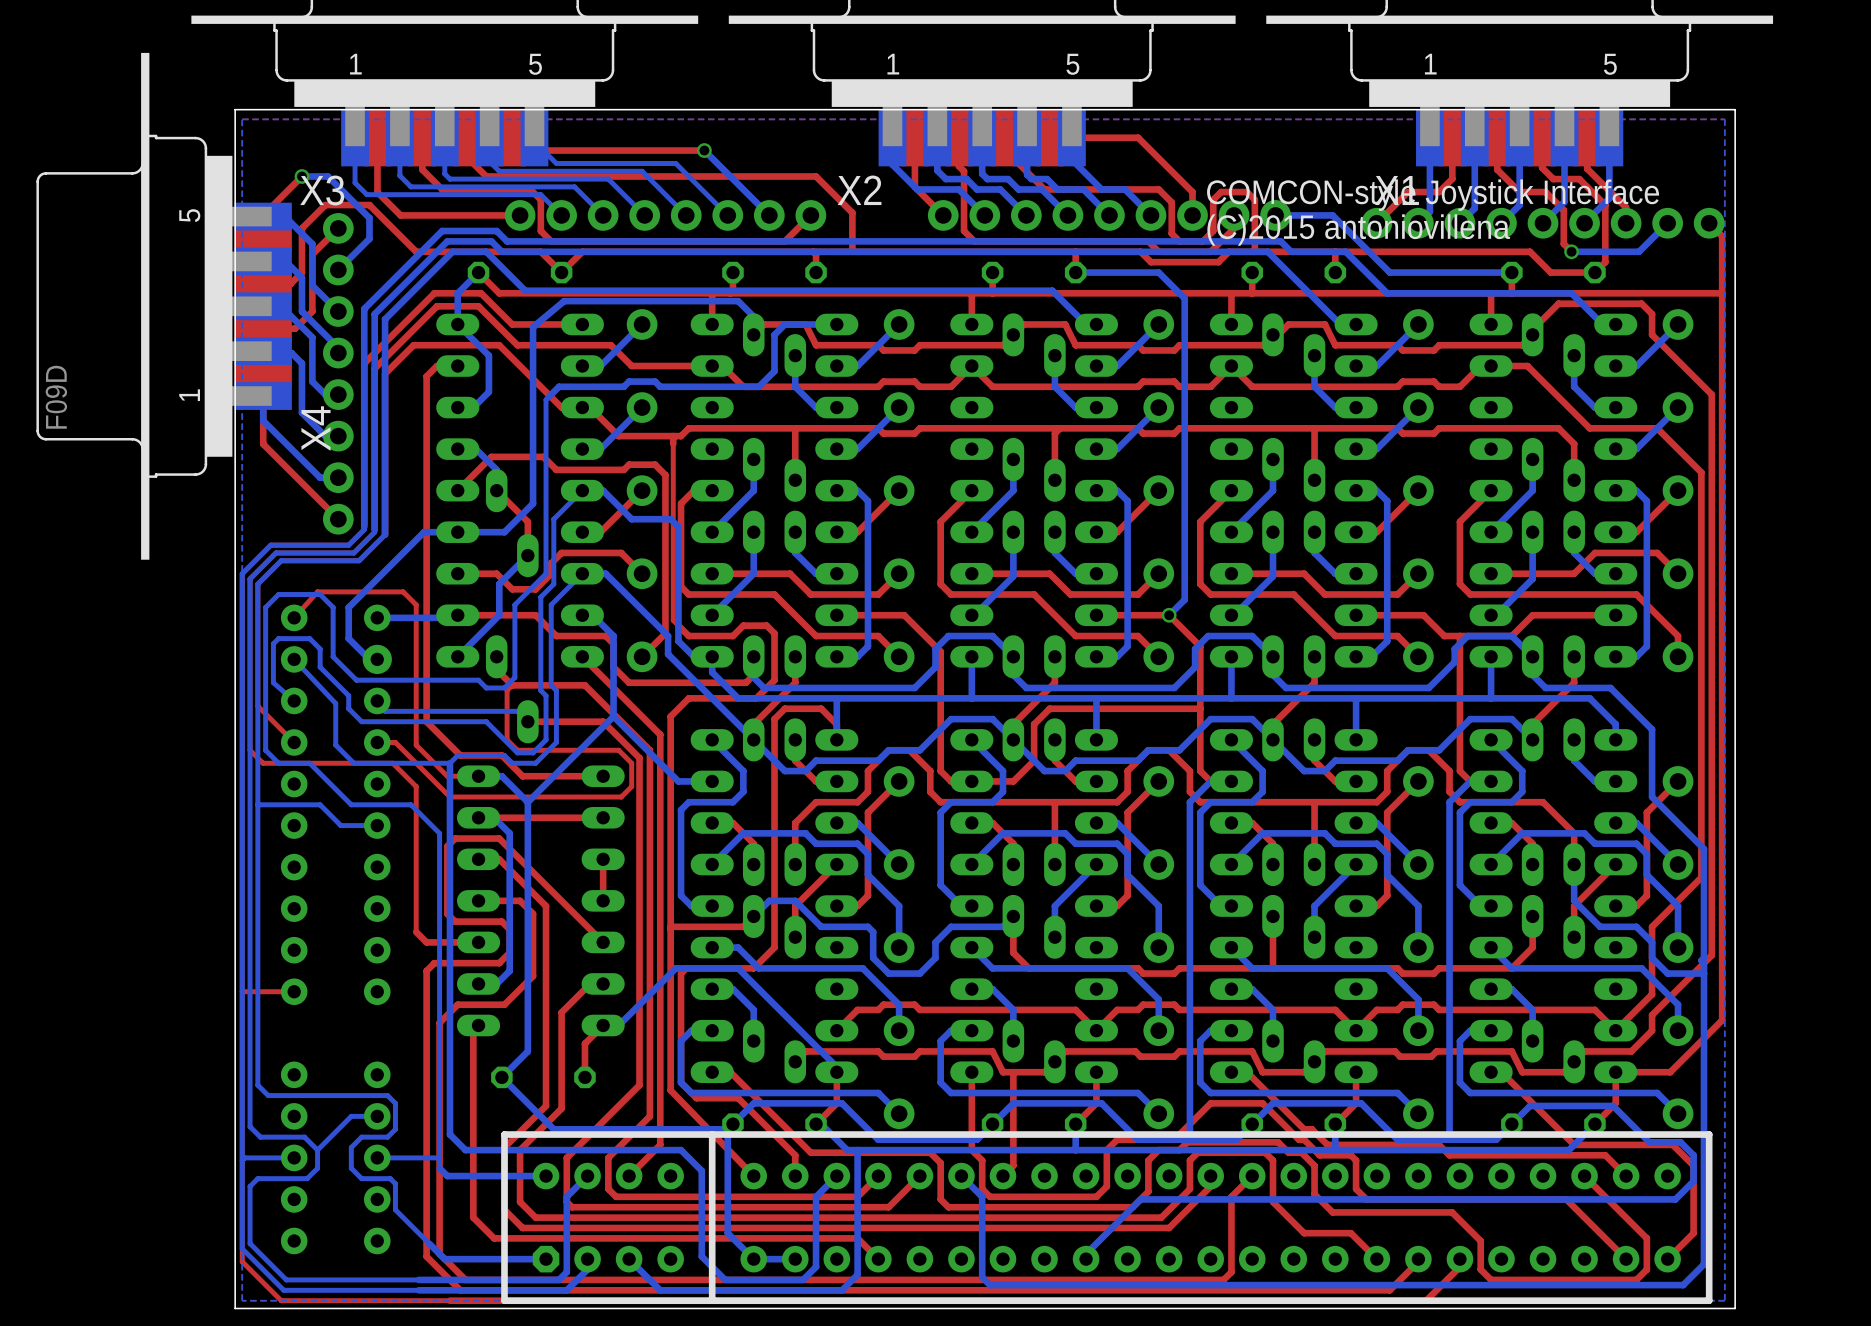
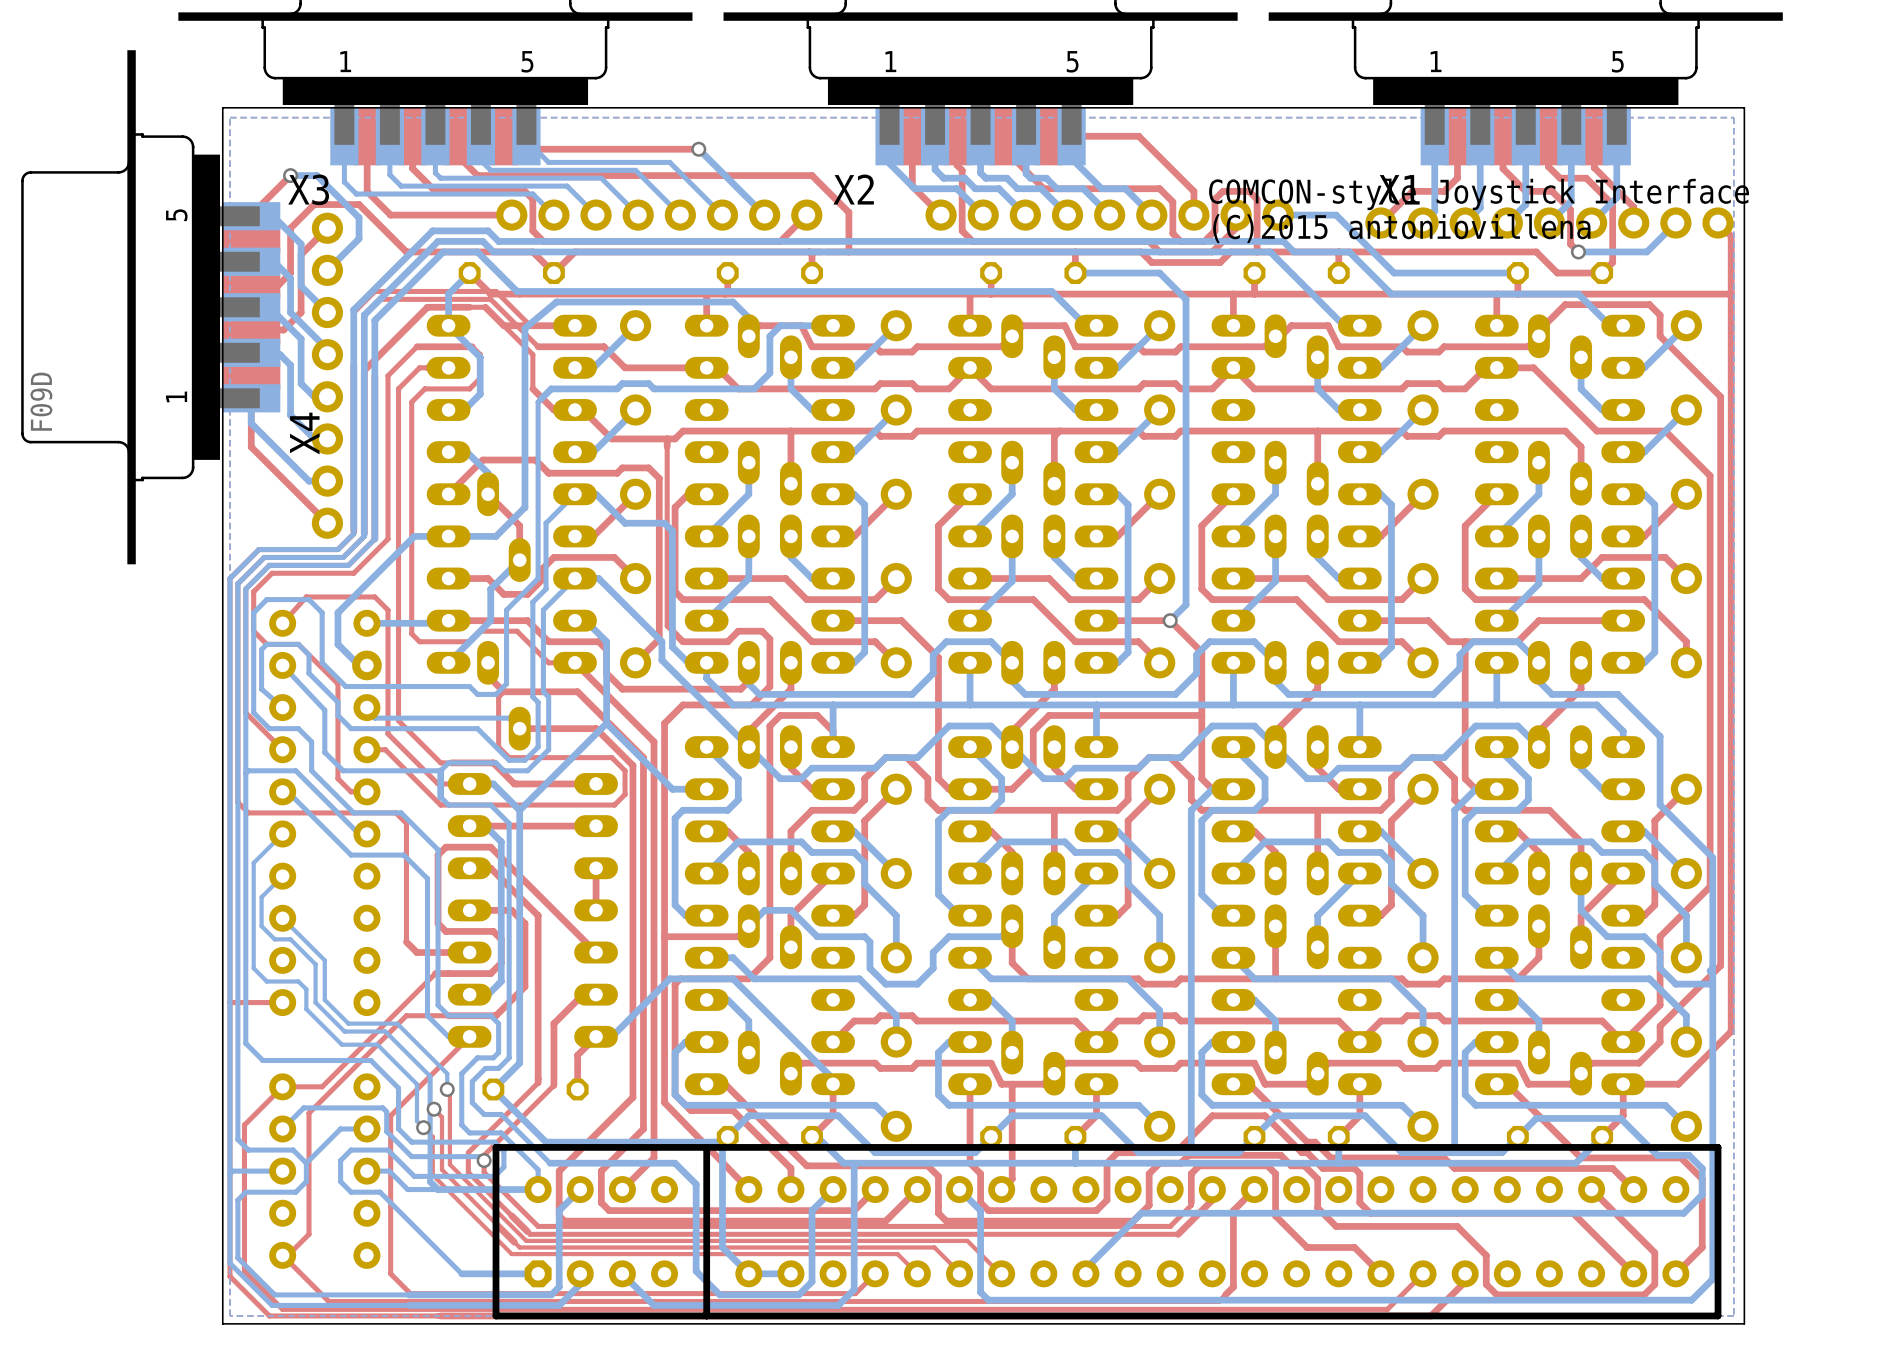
top track: (478, 306) (517, 345) (546, 345) -> (469, 307) (485, 307)
top track: (494, 306) (481, 293) (434, 293) (364, 363) -> (530, 325) (495, 291) (374, 291) (353, 312) (353, 365)
top track: (426, 345) (413, 345) (385, 373) -> (416, 346) (388, 375) (388, 539) (353, 573) (272, 573) (253, 591) (253, 631) (266, 644) (298, 644) (337, 683) (337, 778) (351, 791) (366, 791)
top track: (481, 345) (499, 345) (540, 386) -> (503, 325) (532, 354) (532, 388)
top track: none -> (472, 346) (480, 354) (480, 378) (469, 388) (424, 388) (411, 402) (411, 633) (419, 641) (469, 641) (480, 631) (517, 631) (548, 662) (575, 662)
top track: none -> (538, 346) (490, 299) (380, 299) (364, 315) (364, 370)
top track: (436, 366) (426, 376) (426, 721) (460, 755) -> (427, 367) (419, 367) (398, 388) (398, 720) (440, 762) (451, 762)
top track: (385, 591) (403, 591) (416, 604) (416, 745) -> (374, 596) (388, 610) (388, 733) (406, 752)
bottom track: (265, 706) (265, 750) (278, 763) -> (245, 773) (248, 770) (266, 770)
bottom track: none -> (253, 712) (269, 728) (298, 728) (311, 741) (311, 770) (353, 812)
top track: (250, 750) (263, 763) (392, 763) (416, 786) (416, 815) -> (237, 757) (237, 802) (248, 812) (395, 812) (406, 823)
bottom track: (307, 763) (309, 763) (351, 804) (364, 804) -> (295, 770) (359, 834)
bottom track: (449, 789) (449, 1134) (465, 1150) (557, 1150) -> (440, 797) (448, 805) (490, 805) (509, 823) (509, 1057) (498, 1068) (485, 1068) (472, 1081) (472, 1102) (484, 1114) (501, 1114) (549, 1163)
bottom track: (320, 804) (257, 804) -> (309, 812) (287, 791) (282, 791)
bottom track: none -> (282, 834) (253, 862) (253, 968) (266, 981) (298, 981) (306, 989) (306, 1009) (341, 1044) (377, 1044) (416, 1084) (416, 1121) (423, 1127)
bottom track: (369, 825) (340, 825) -> (469, 1036) (448, 1036) (427, 1015) (427, 878) (403, 855) (351, 855) (330, 834)
bottom track: (439, 833) (439, 1064) -> (282, 876) (261, 897) (261, 926) (274, 939) (290, 939) (315, 964) (315, 1002) (344, 1031) (385, 1031) (430, 1076)
bottom track: none -> (430, 841) (438, 849) (438, 1005) (448, 1015) (490, 1015) (498, 1023) (498, 1052) (493, 1057) (477, 1057) (461, 1073) (461, 1125) (469, 1132) (501, 1132) (538, 1169) (538, 1189)
bottom track: none -> (282, 918) (324, 960) (324, 999) (348, 1023) (397, 1023) (447, 1073) (447, 1089)
top track: (444, 963) (434, 963) (426, 970) (426, 1256) (460, 1290) (1389, 1290) (1418, 1261) (1418, 1259) -> (435, 973) (322, 1086) (282, 1086) (244, 1125) (244, 1271) (282, 1309) (1387, 1309) (1423, 1273)
top track: (457, 1004) (439, 1022) (439, 1253) (465, 1279) (1223, 1279) -> (448, 1015) (406, 1015) (309, 1113) (309, 1234) (287, 1255) (282, 1255) (328, 1301) (1218, 1301) (1225, 1294)
top track: (473, 1030) (473, 1217) (494, 1238) (857, 1238) (878, 1259) -> (464, 1042) (390, 1115) (390, 1273) (410, 1293) (855, 1293) (875, 1273)
bottom track: (257, 1031) (257, 1085) (268, 1095) (314, 1095) -> (245, 1043) (262, 1060) (370, 1060) (398, 1088) (398, 1128) (411, 1142) (494, 1142) (503, 1151) (503, 1167) (494, 1176) (414, 1176) (388, 1150) (377, 1150)
top track: (546, 1070) (546, 1105) (504, 1147) (504, 1209) -> (434, 1109) (442, 1117) (442, 1169) (495, 1223)
top track: (561, 1073) (561, 1108) (520, 1150) (520, 1202) -> (538, 1082) (468, 1152) (468, 1172) (511, 1215)
top track: none -> (447, 1089) (449, 1092) (449, 1164) (526, 1240) (967, 1240) (1001, 1273)
via: none -> (447, 1089)
bottom track: none -> (303, 1107) (282, 1128)
bottom track: (387, 1095) (395, 1103) (395, 1129) (387, 1137) -> (377, 1107) (382, 1107) (386, 1111) (386, 1131) (411, 1156) (480, 1156) (484, 1160)
via: none -> (434, 1109)
top track: none -> (423, 1127) (432, 1136) (432, 1175) (511, 1254) (897, 1254) (917, 1273)
via: none -> (423, 1127)
via: none -> (484, 1160)
bottom track: (439, 1157) (399, 1157) -> (438, 1189) (407, 1189) (389, 1171)
bottom track: (395, 1183) (395, 1209) (444, 1259) (470, 1259) -> (385, 1197) (461, 1273)
top track: (1189, 1189) (1161, 1217) (535, 1217) -> (1191, 1202) (1191, 1205) (1170, 1226) (538, 1226) (484, 1172) (484, 1155) (553, 1085)
top track: (1176, 1220) (1169, 1228) (522, 1228) -> (1178, 1234) (530, 1234) (527, 1231)
top track: none -> (514, 1242) (519, 1247) (934, 1247) (959, 1273)

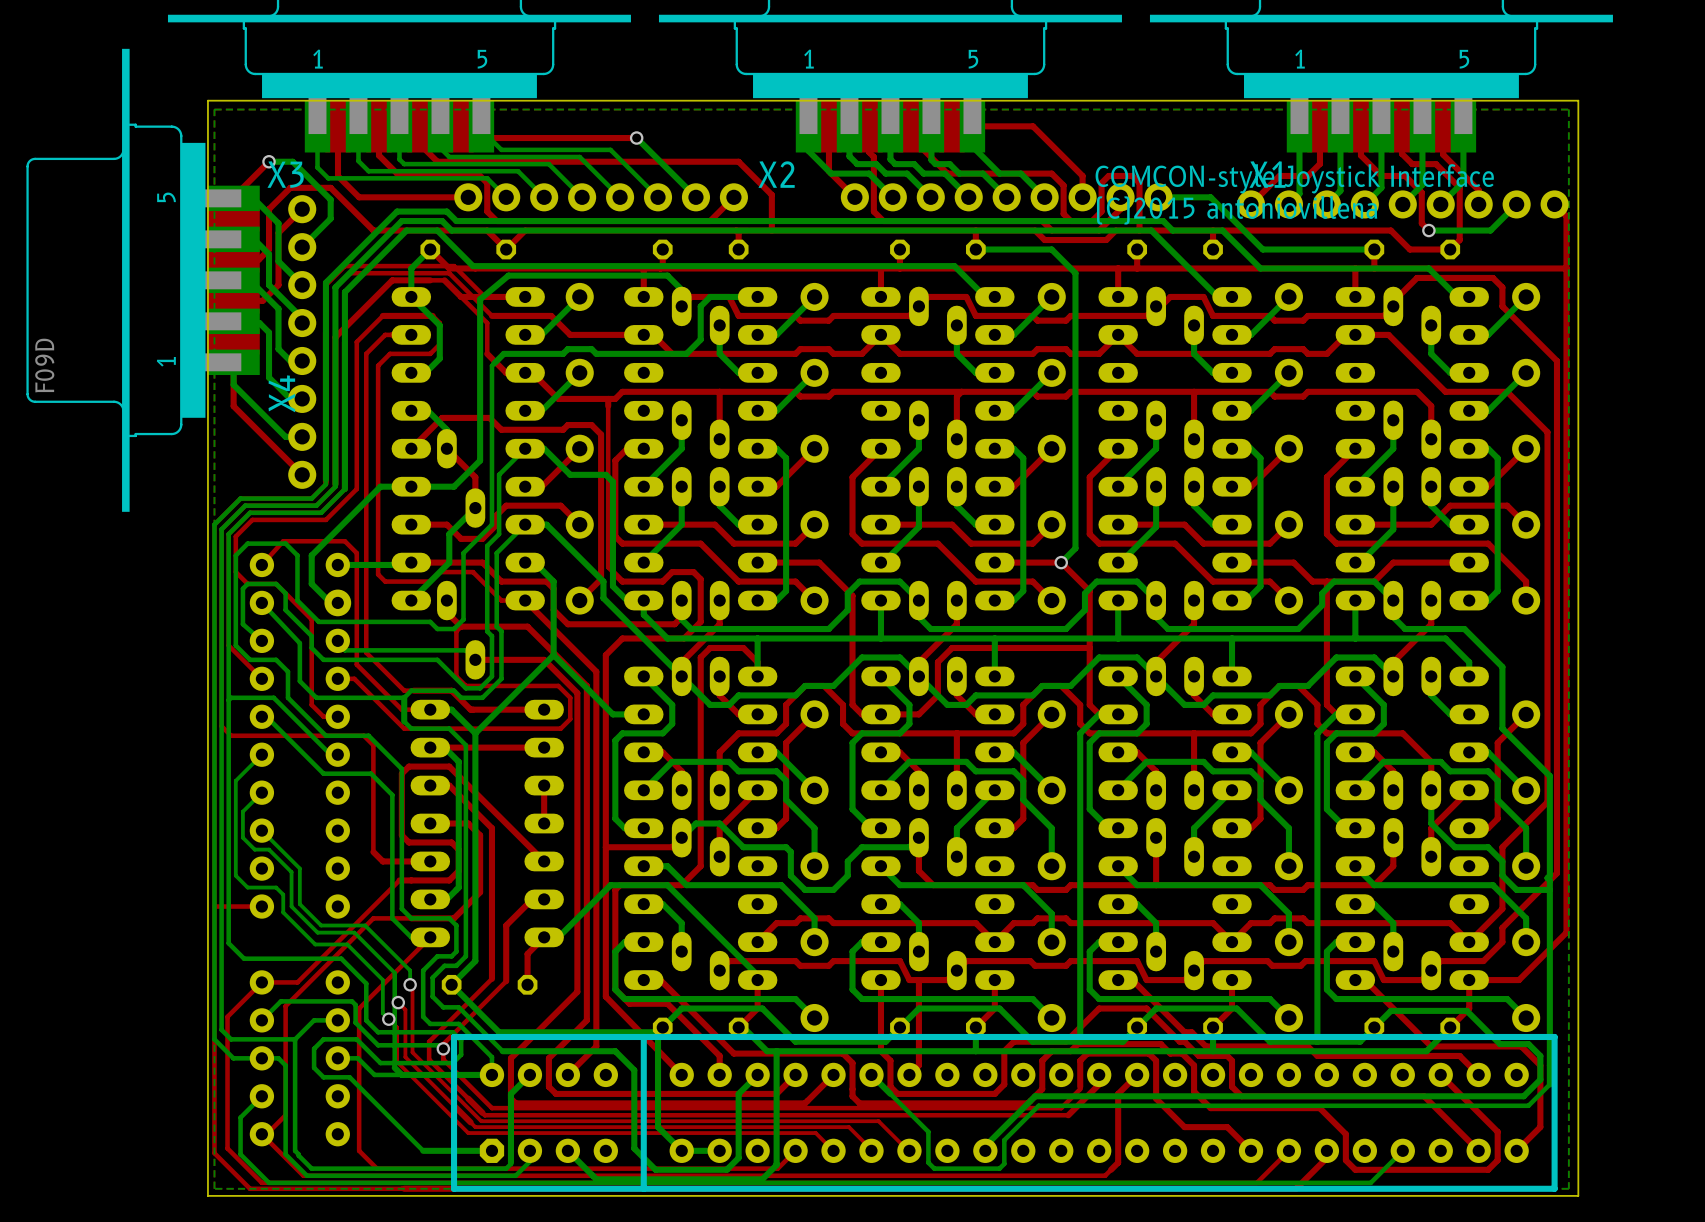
bottom track: (229, 1150) (229, 1263) (272, 1305) (559, 1305) (580, 1284) -> (261, 1058) (278, 1058) (285, 1065) (285, 1154) (306, 1175) (515, 1175) (529, 1160)
bottom track: (293, 1150) (306, 1163) -> none
bottom track: (319, 1150) (306, 1163) -> none
bottom track: (306, 1163) (306, 1181) (295, 1192) (245, 1192) (237, 1200) (237, 1258) (274, 1294) (551, 1294) (559, 1287) -> (271, 1039) (295, 1039) (295, 1150) (311, 1168) (506, 1168) (510, 1162)
bottom track: (251, 1171) (232, 1171) (229, 1173) -> (233, 1058) (214, 1039)
bottom track: (1712, 1200) (1712, 1279) (1691, 1300) (988, 1300) (980, 1292) (980, 1210) -> (1549, 1084) (1528, 1105) (1038, 1105) (1004, 1140) (1004, 1163) (999, 1168) (934, 1168) (928, 1162) (928, 1131) (890, 1093)
bottom track: none -> (261, 1096) (240, 1117) (240, 1154) (269, 1182) (1370, 1182) (1402, 1150)

